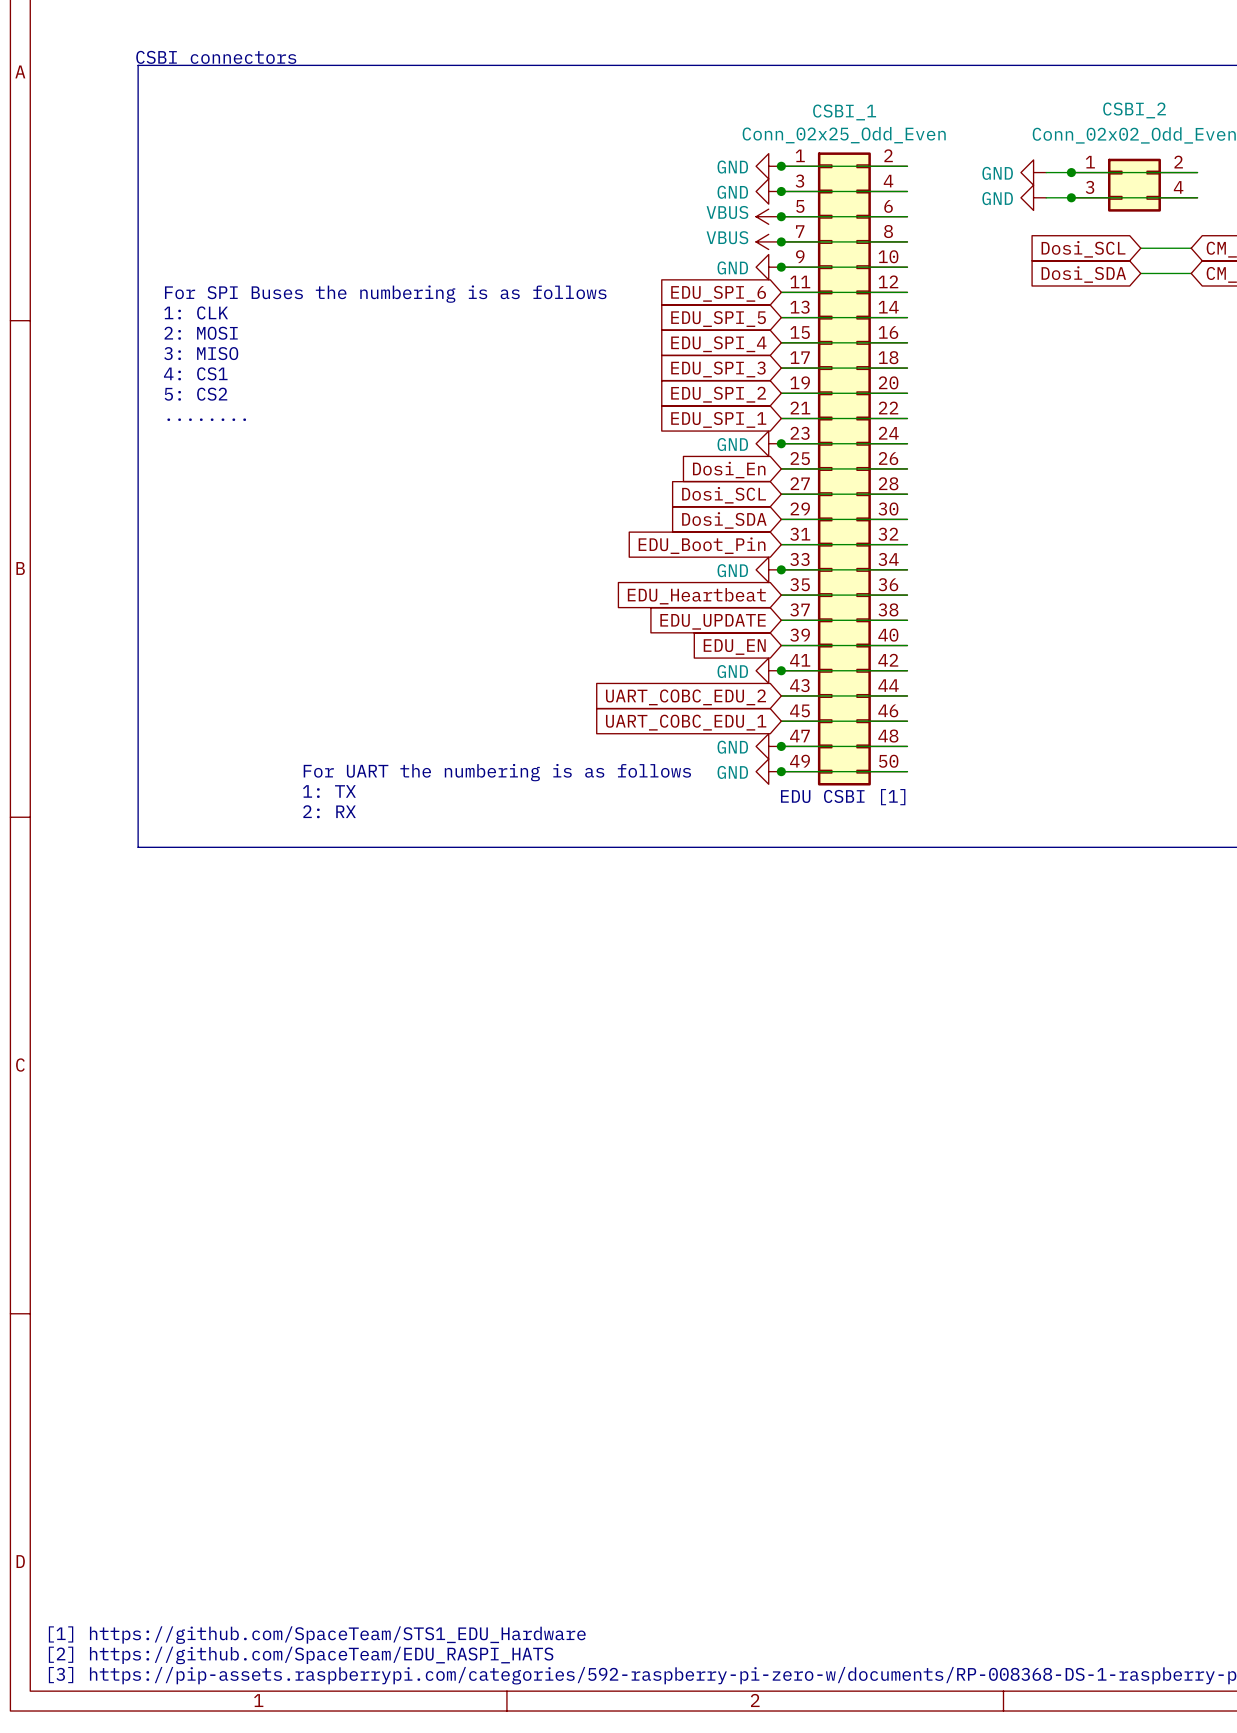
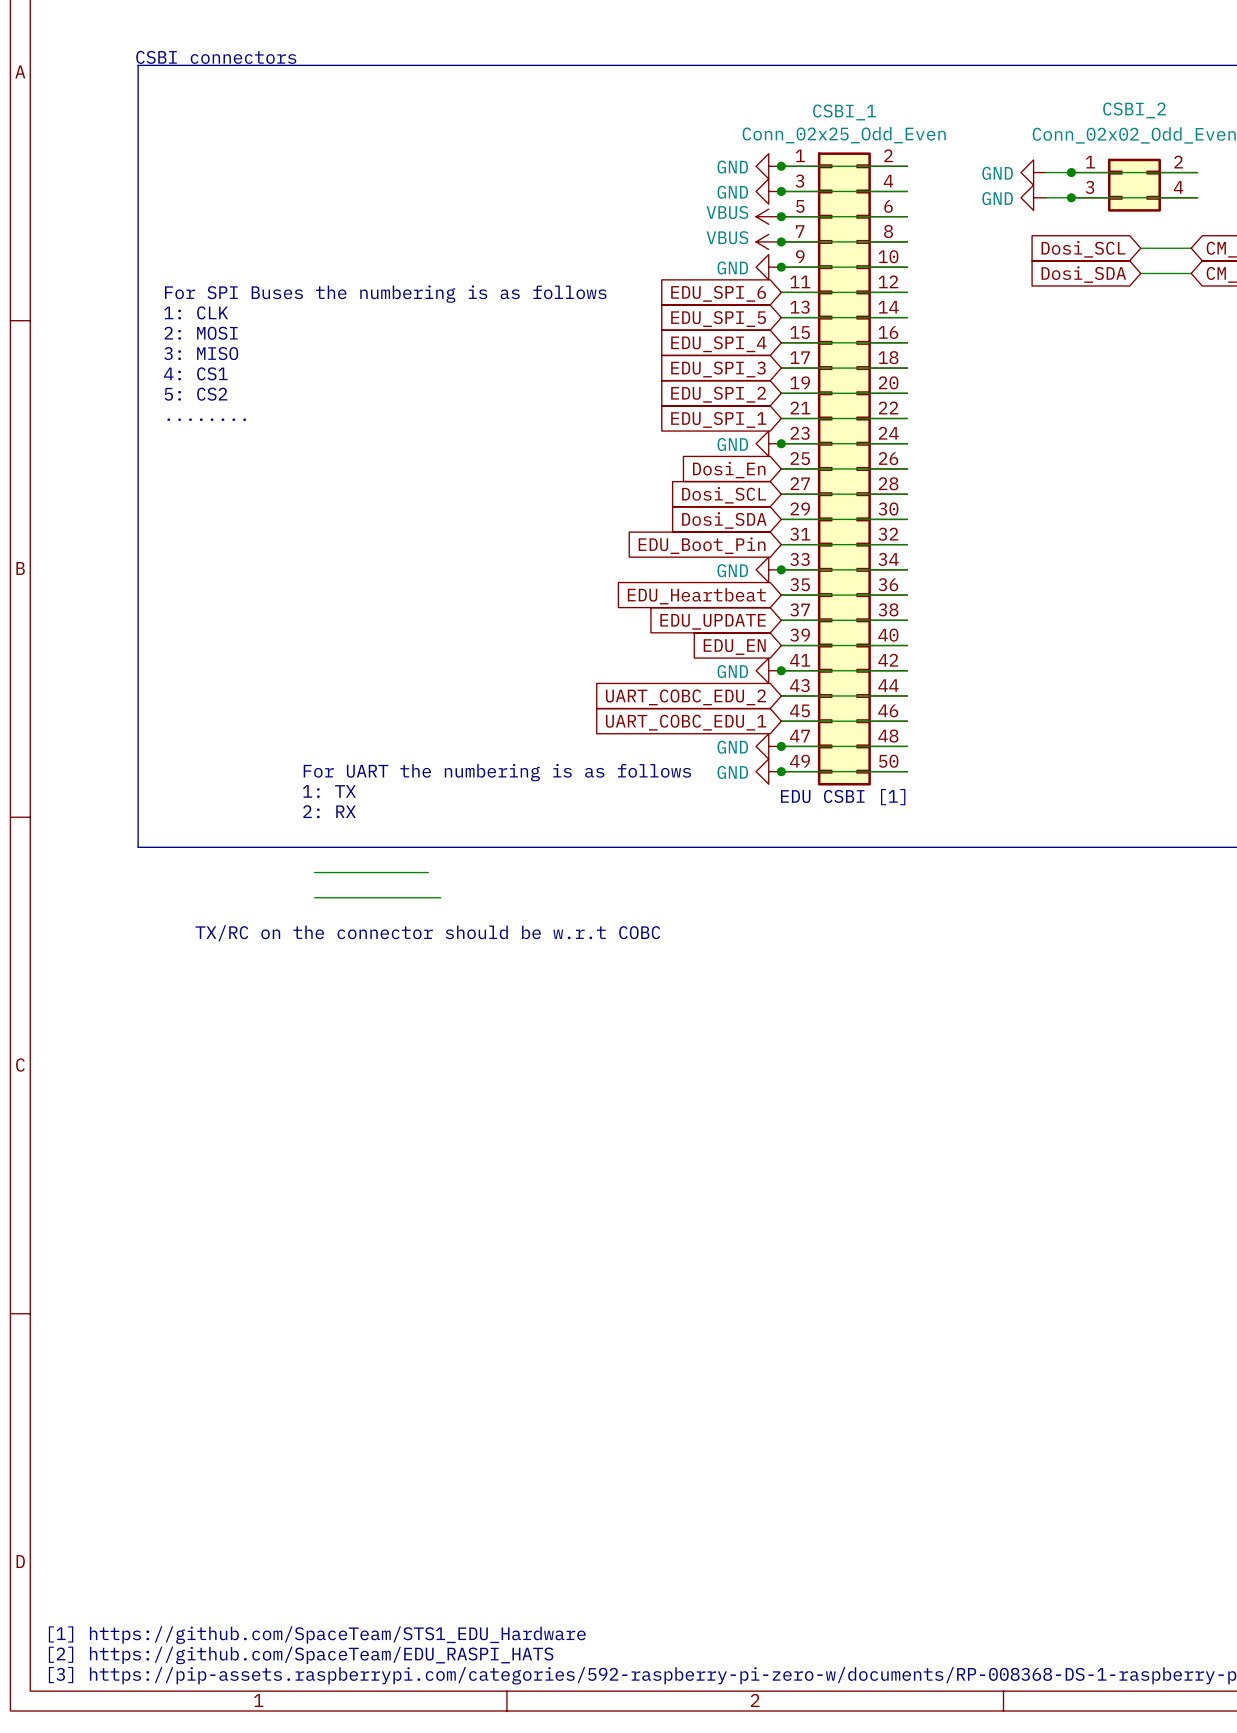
wire: none -> (314, 872) (428, 872)
wire: none -> (314, 897) (440, 897)
text: none -> TX/RC on the connector should be w.r.t COBC (427, 933)

